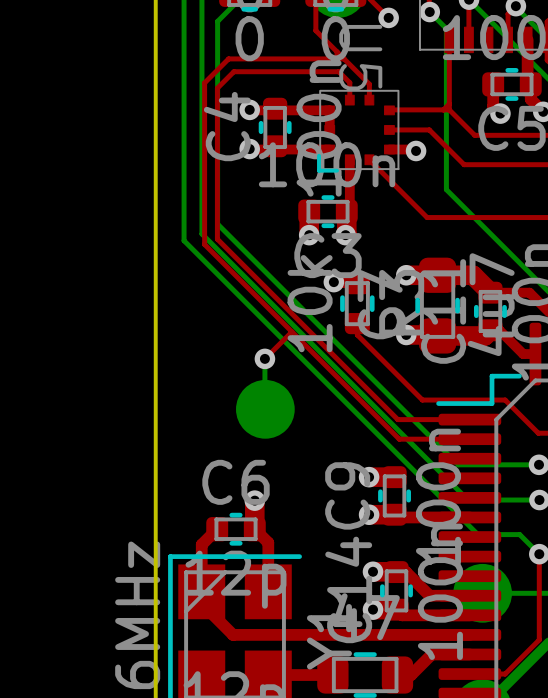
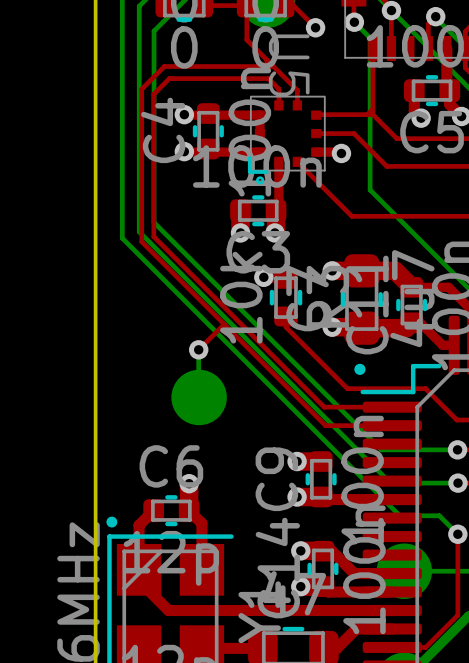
drawing: none -> [256, 176, 265, 185]
drawing: none -> [354, 363, 366, 375]
drawing: none -> [106, 516, 118, 528]

